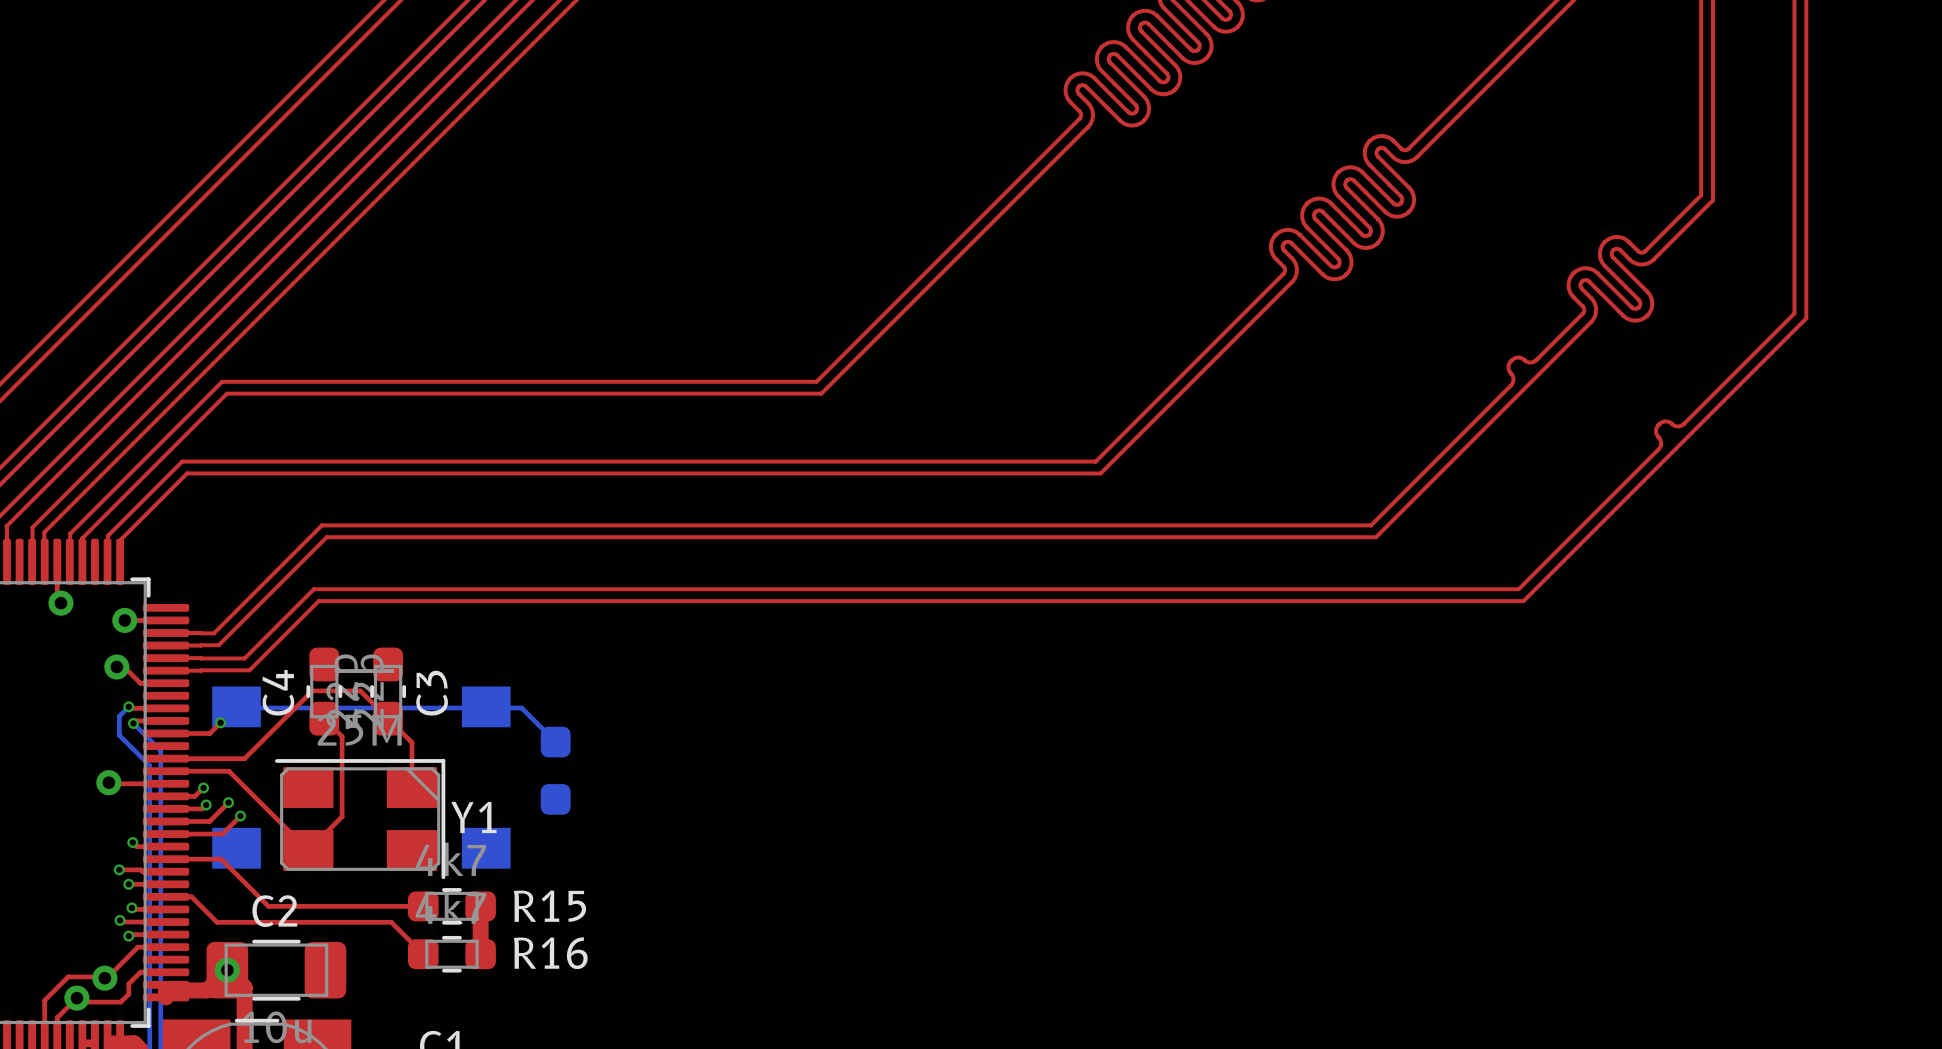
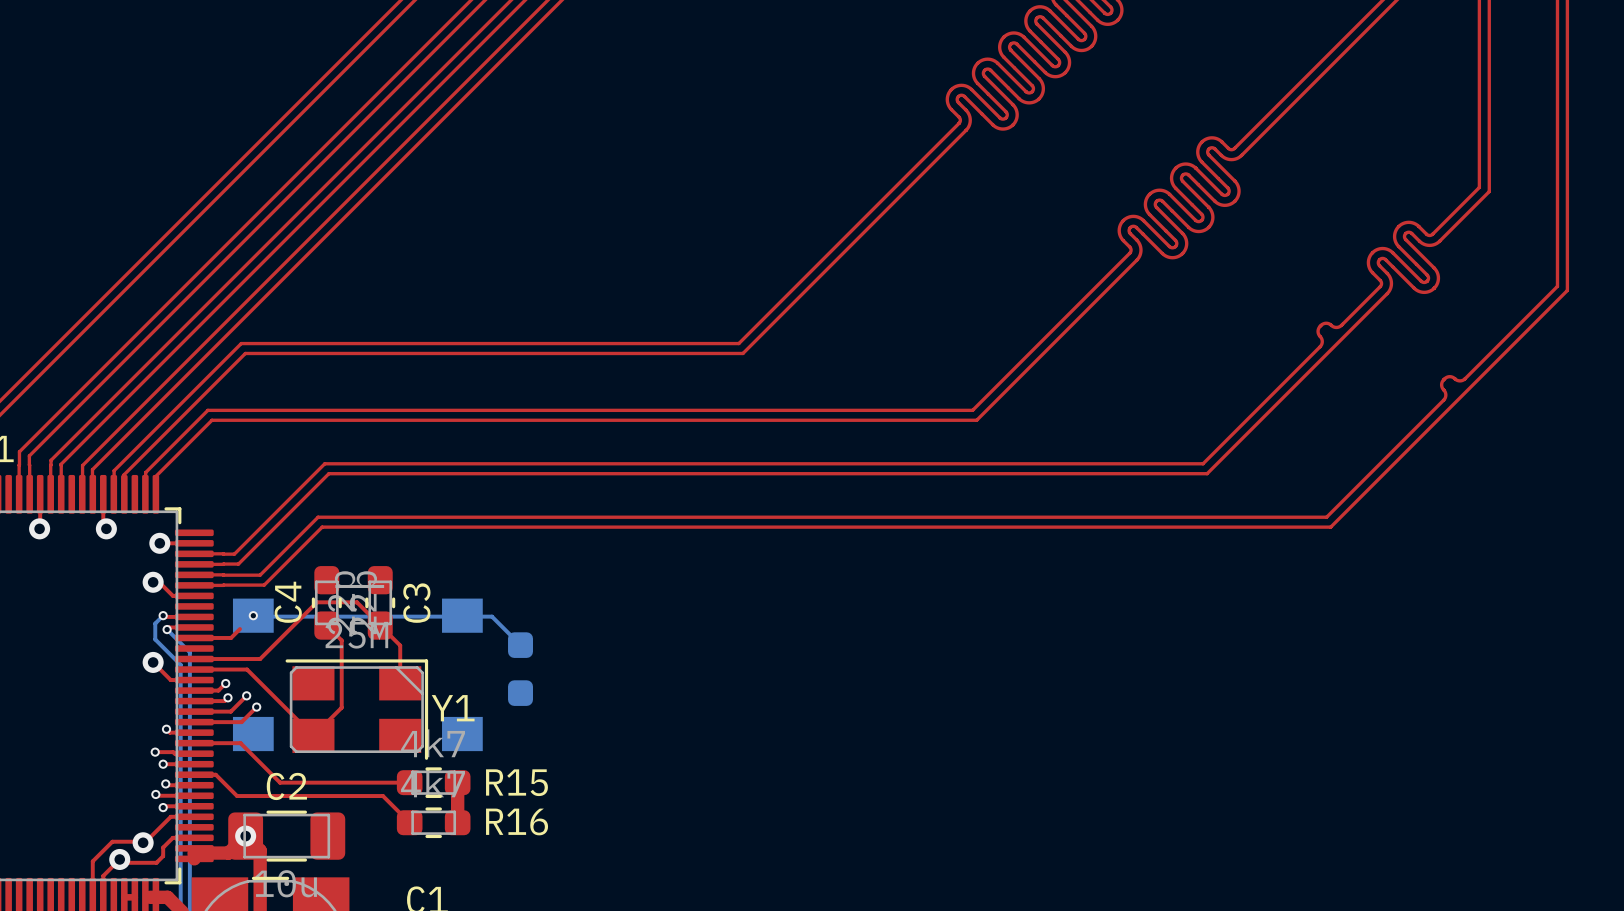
via position: (220, 722) -> (253, 615)
top track: (108, 782) (137, 783) -> (153, 662) (170, 680)
via position: (108, 782) -> (153, 662)

